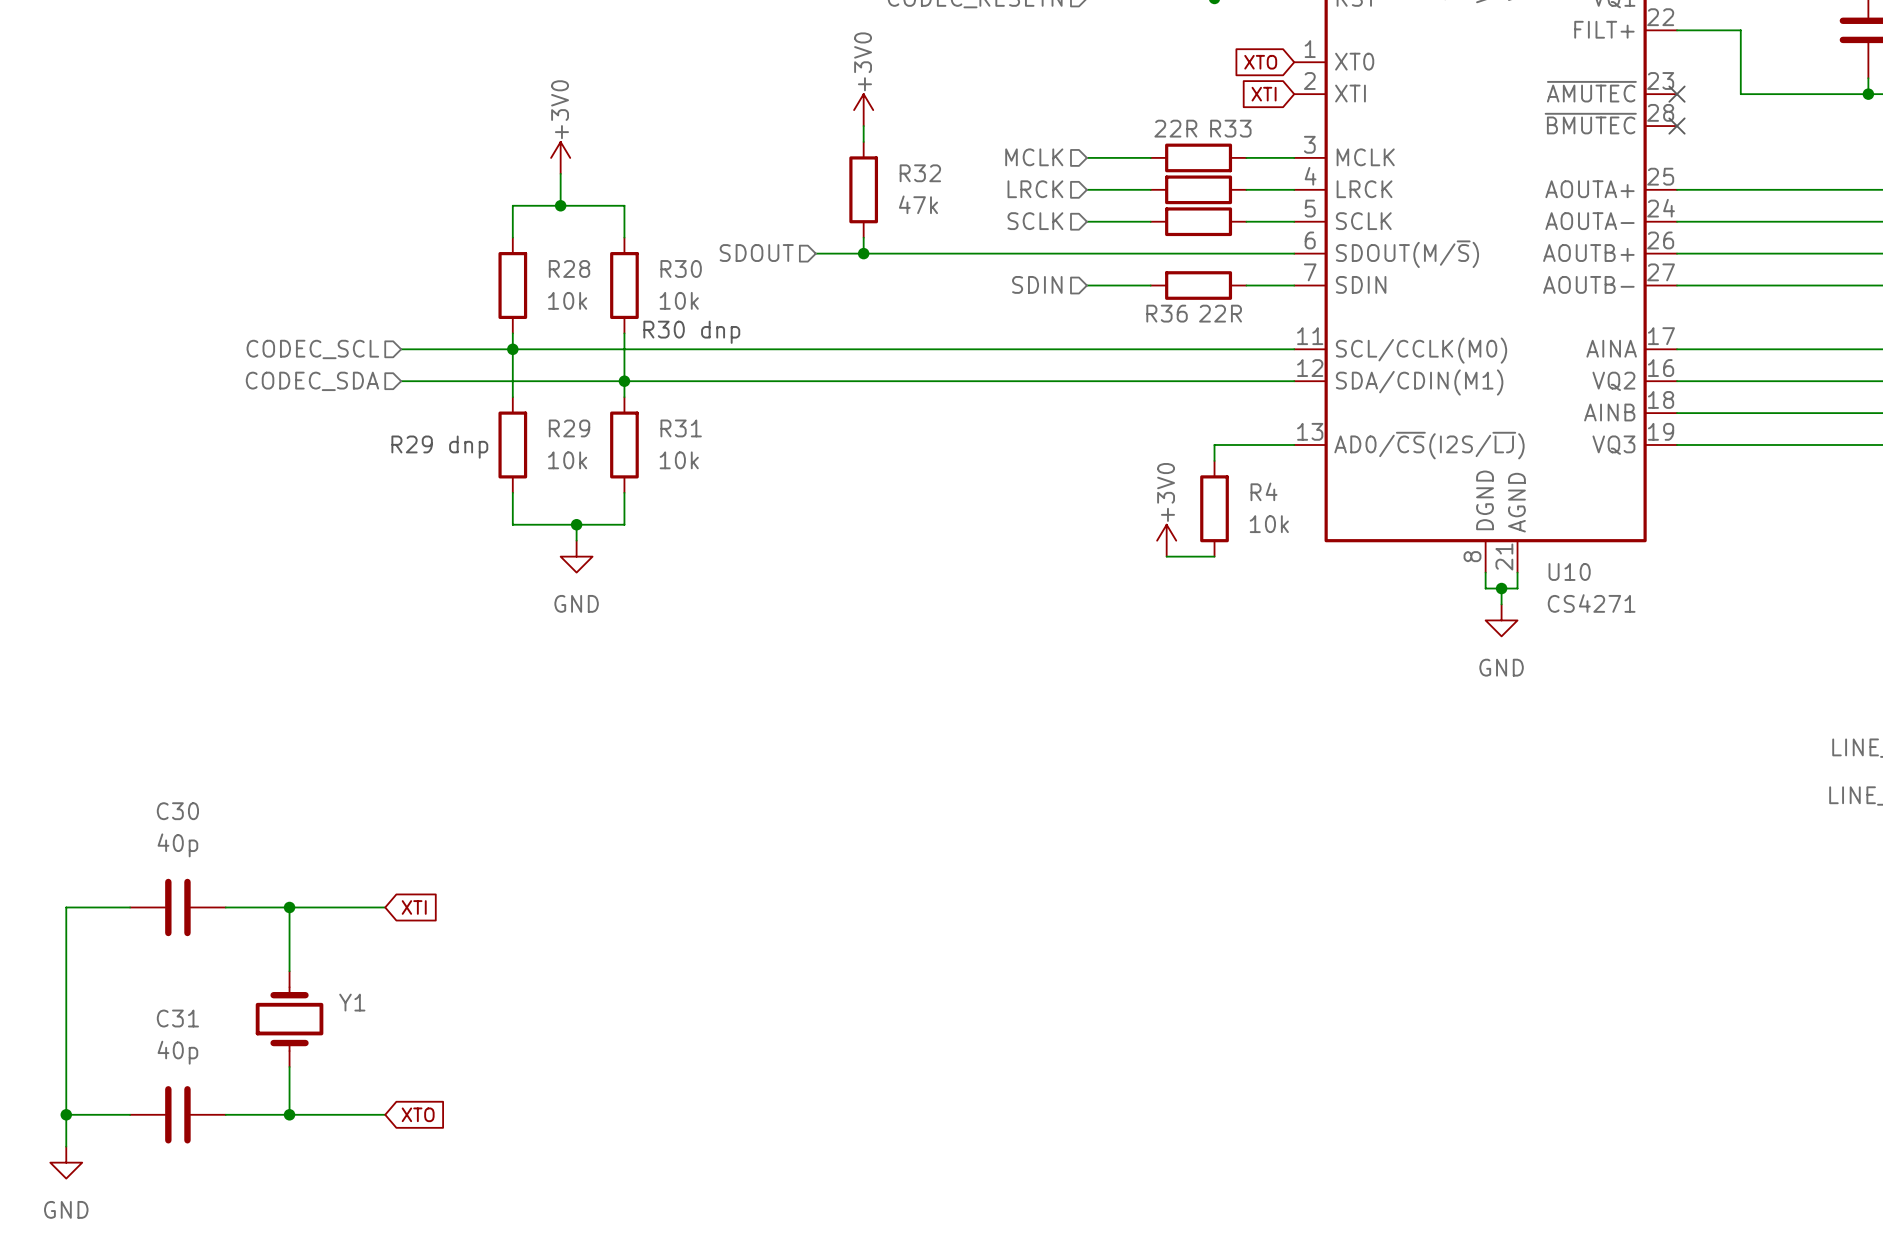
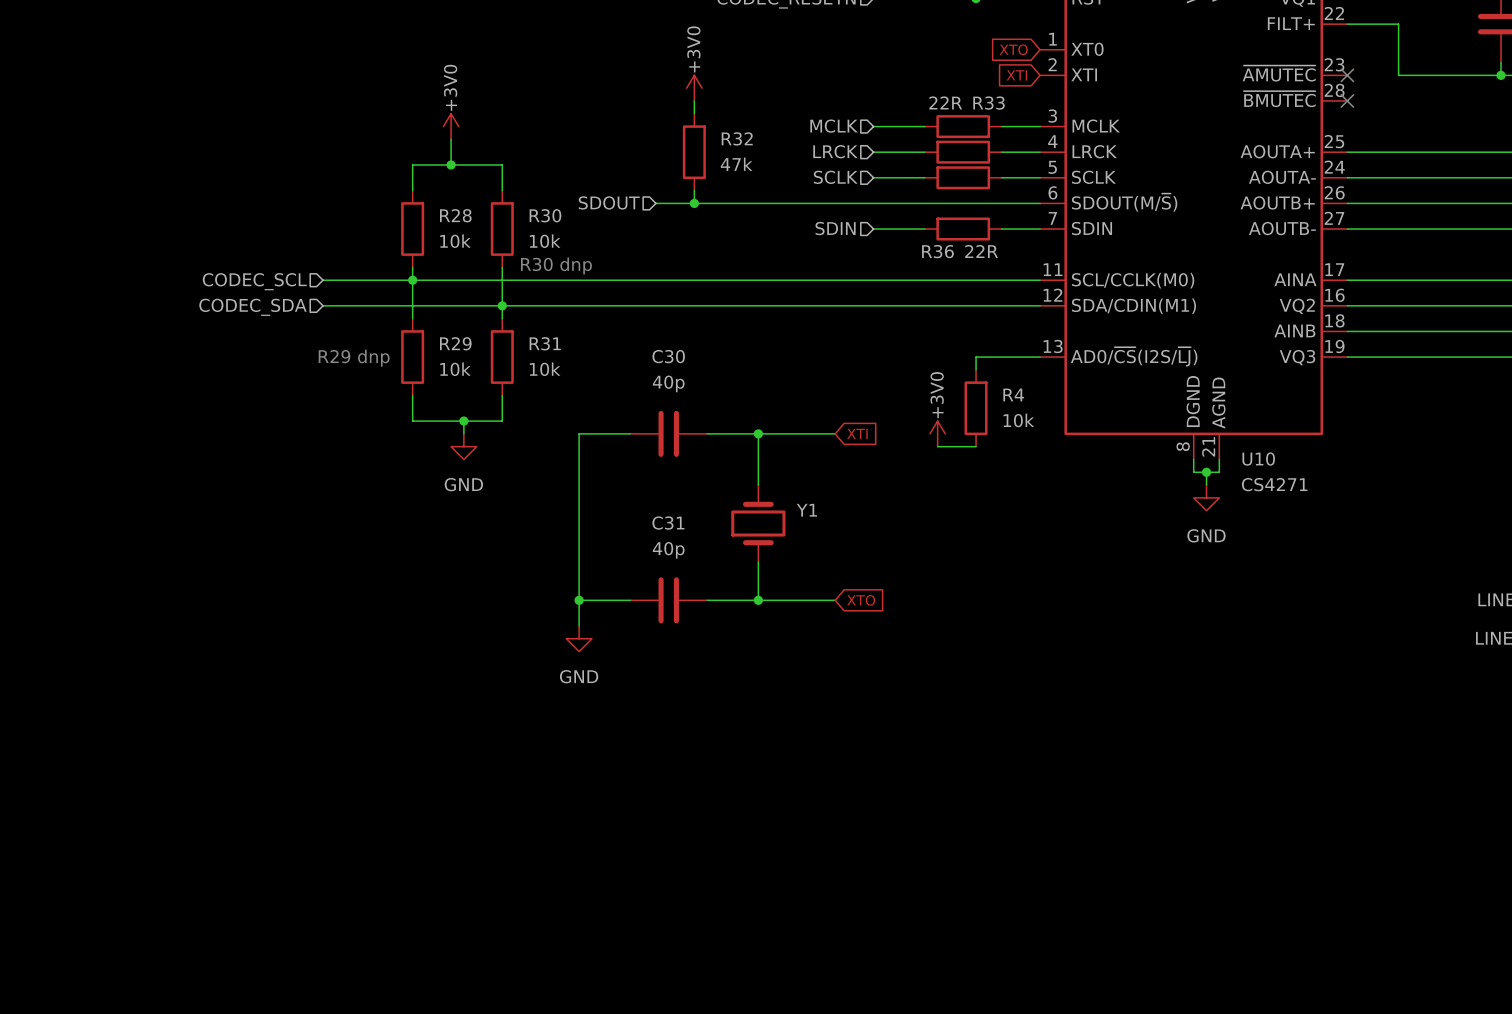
wire: none -> (630, 433) (579, 433) (579, 625)
wire: none -> (707, 433) (835, 433)
wire: none -> (758, 433) (758, 485)
junction: none -> (758, 433)
global label: none -> XTI (857, 433)
wire: none -> (758, 561) (758, 600)
wire: none -> (579, 600) (630, 600)
junction: none -> (579, 600)
wire: none -> (707, 600) (835, 600)
junction: none -> (758, 600)
global label: none -> XTO (861, 600)
power symbol: none -> GND (579, 638)
wire: (130, 907) (66, 907) (66, 1146) -> none
C30 position: (177, 907) -> (668, 433)
wire: (225, 907) (385, 907) -> none
wire: (289, 907) (289, 971) -> none
junction: (289, 907) -> none
global label: XTI (414, 907) -> none
Y1 position: (289, 1019) -> (758, 523)
wire: (289, 1066) (289, 1114) -> none
wire: (66, 1114) (130, 1114) -> none
junction: (66, 1114) -> none
C31 position: (177, 1114) -> (668, 600)
wire: (225, 1114) (385, 1114) -> none
junction: (289, 1114) -> none
global label: XTO (418, 1114) -> none
power symbol: GND (66, 1162) -> none

